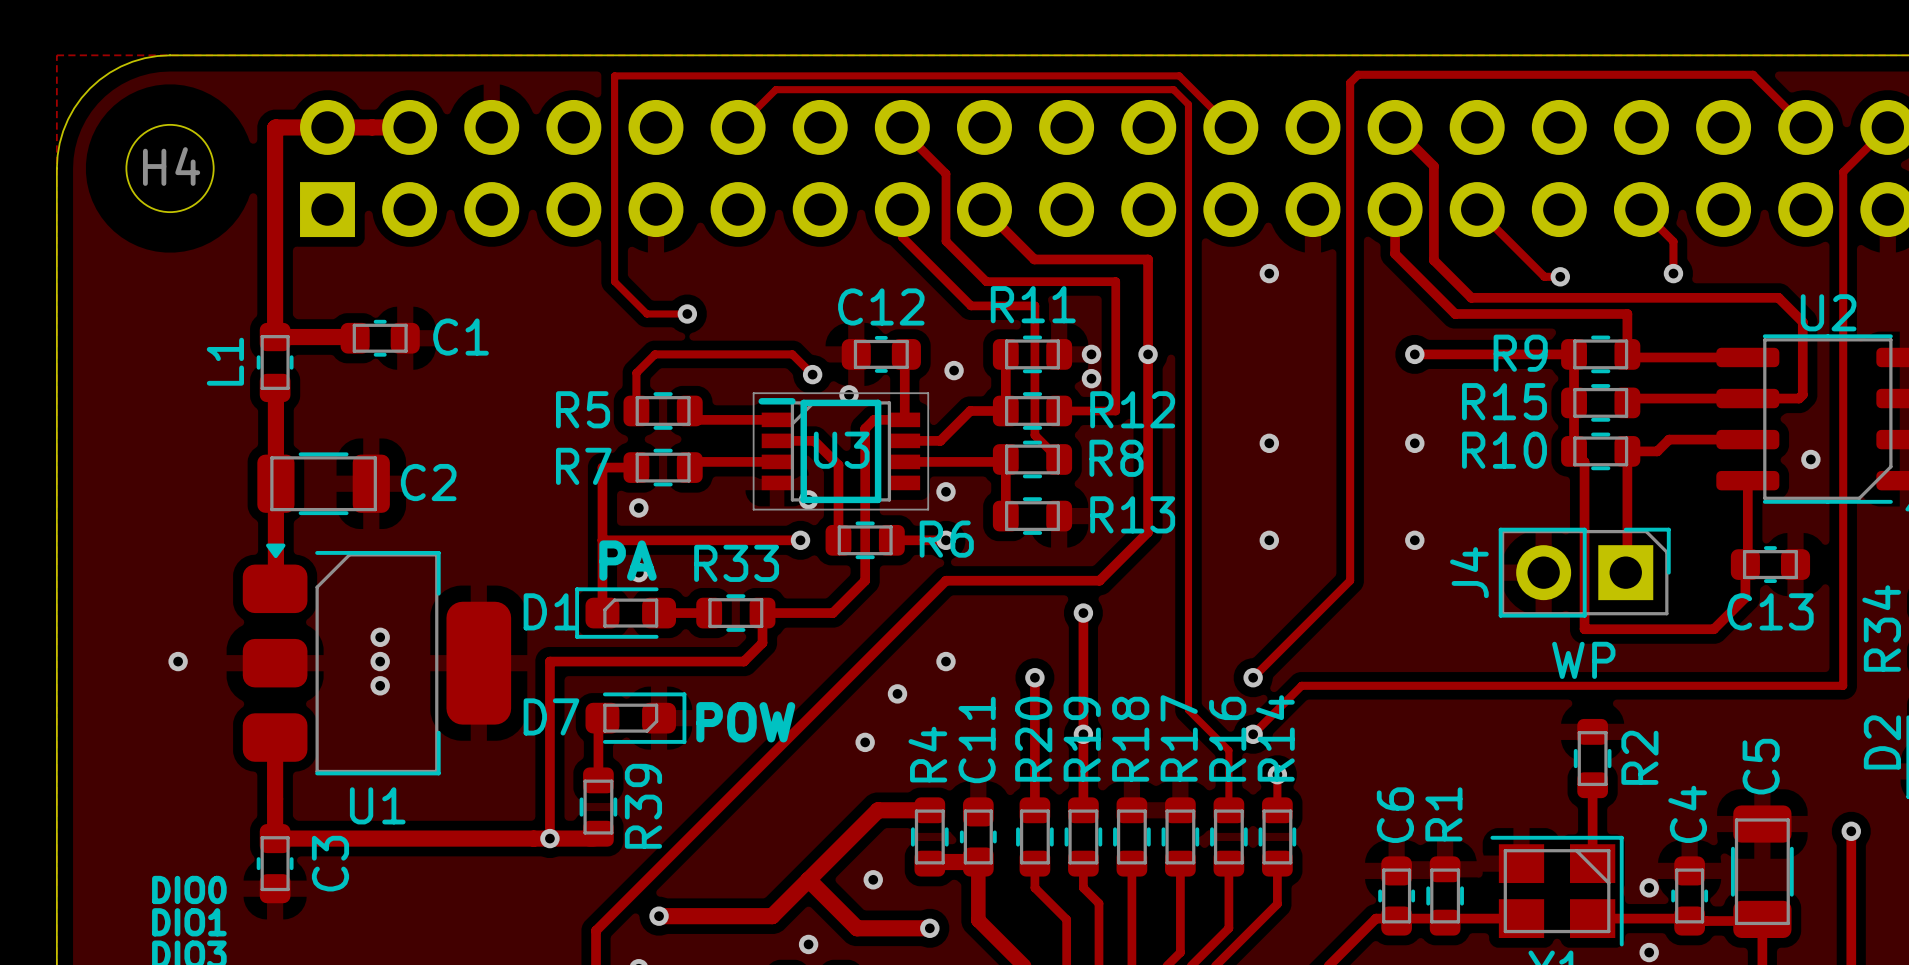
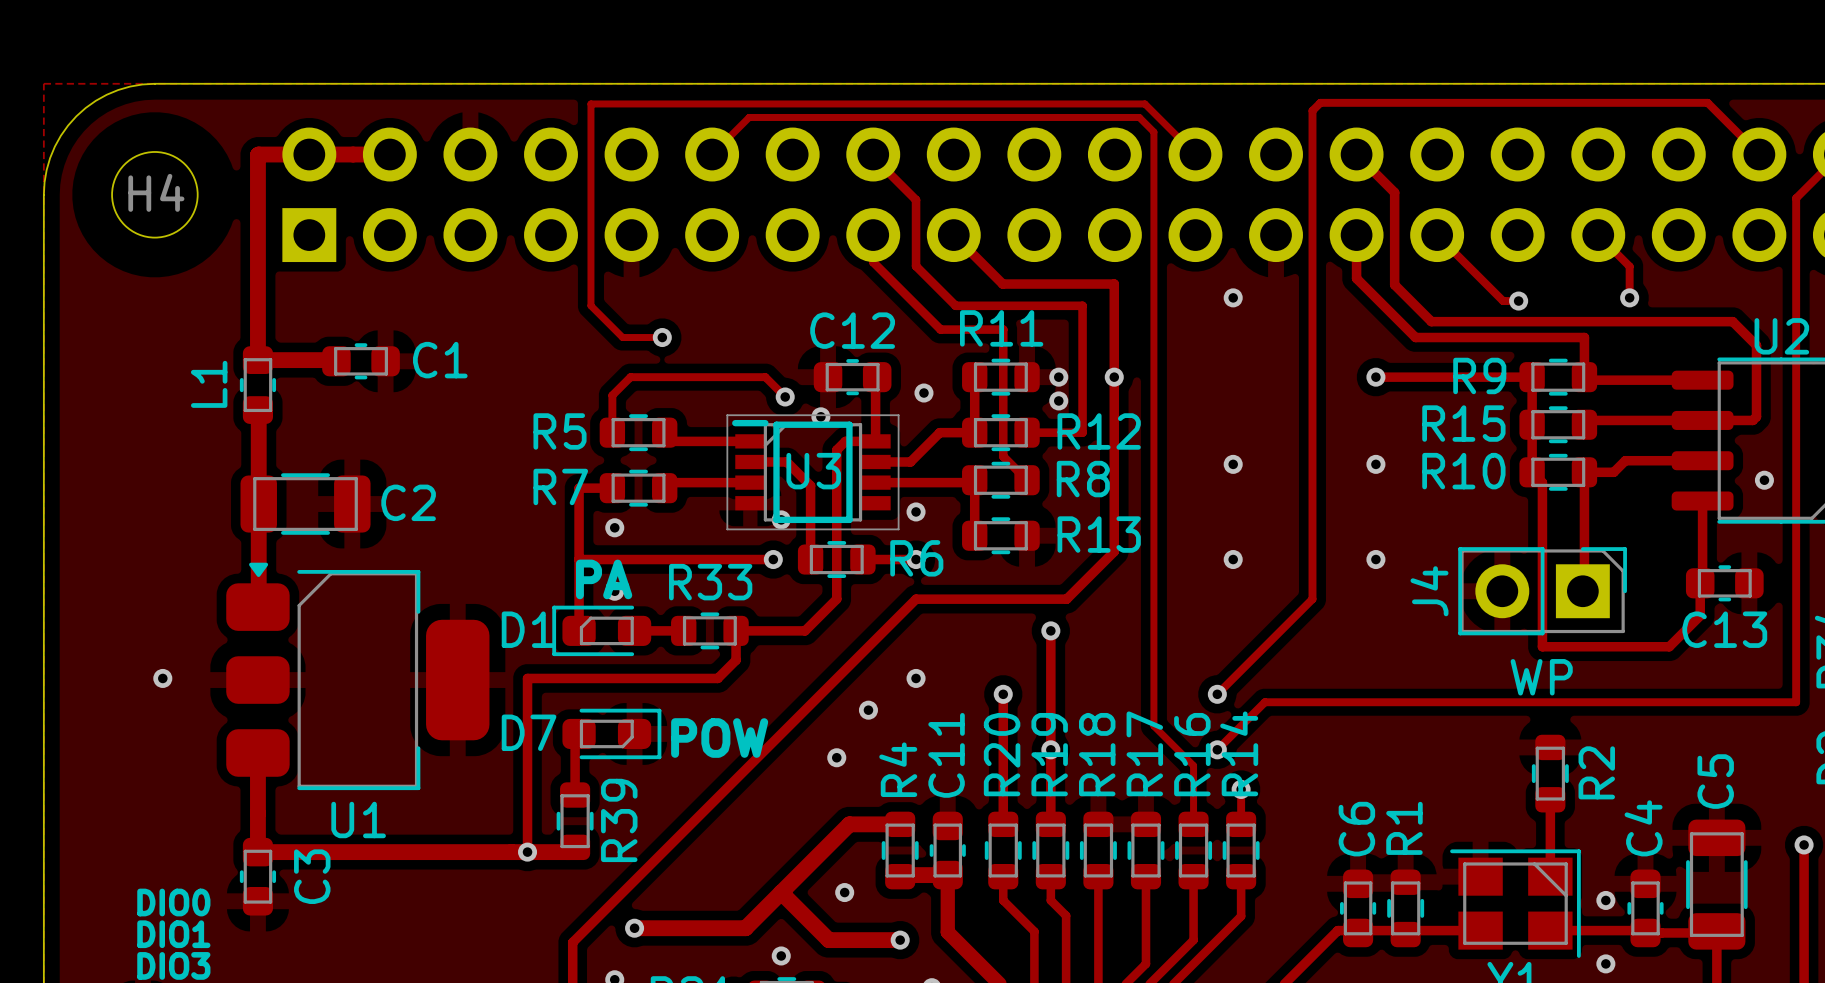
via: (380, 637) -> none
via: (380, 661) -> none
via: (380, 685) -> none

